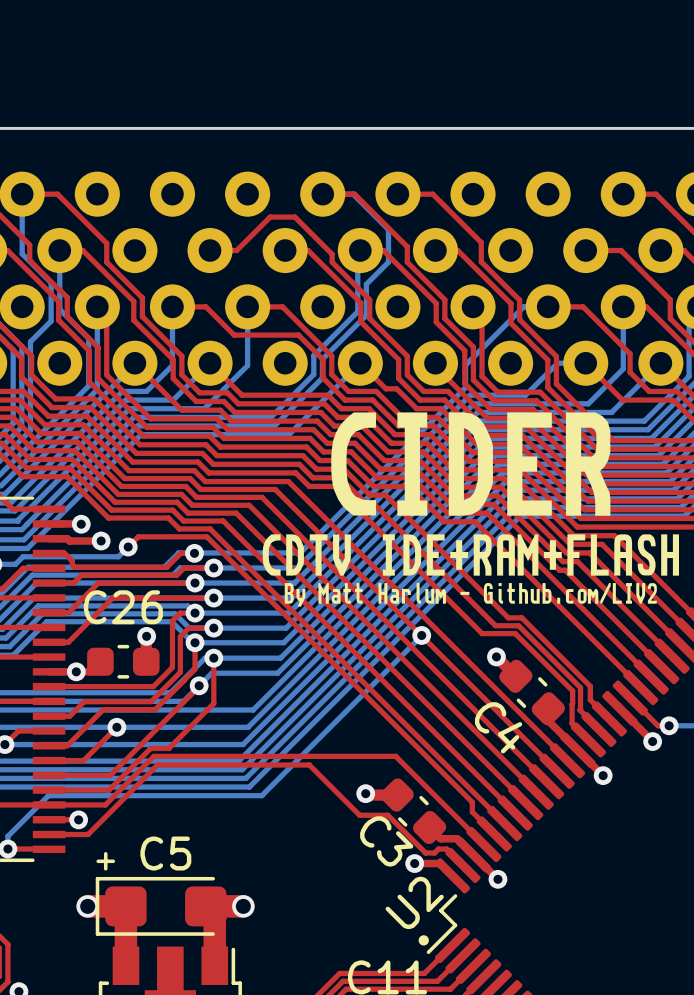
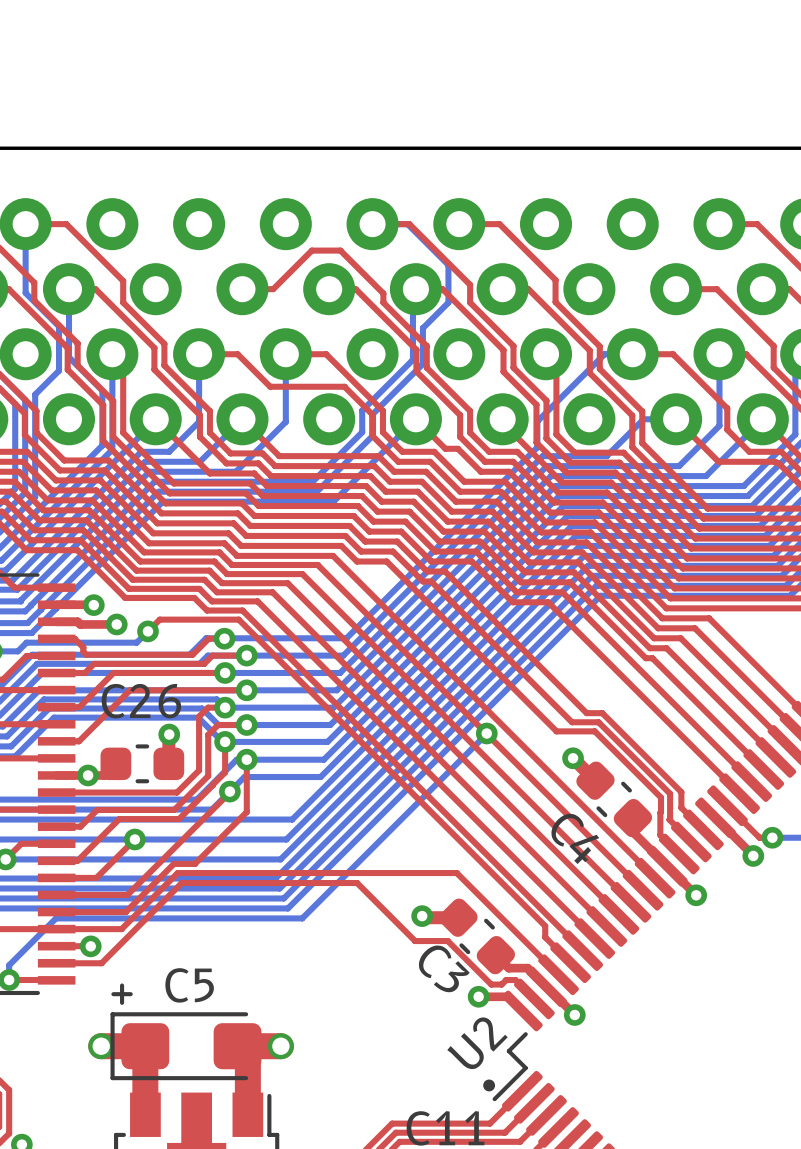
drawing: [262, 412, 679, 607] -> none

